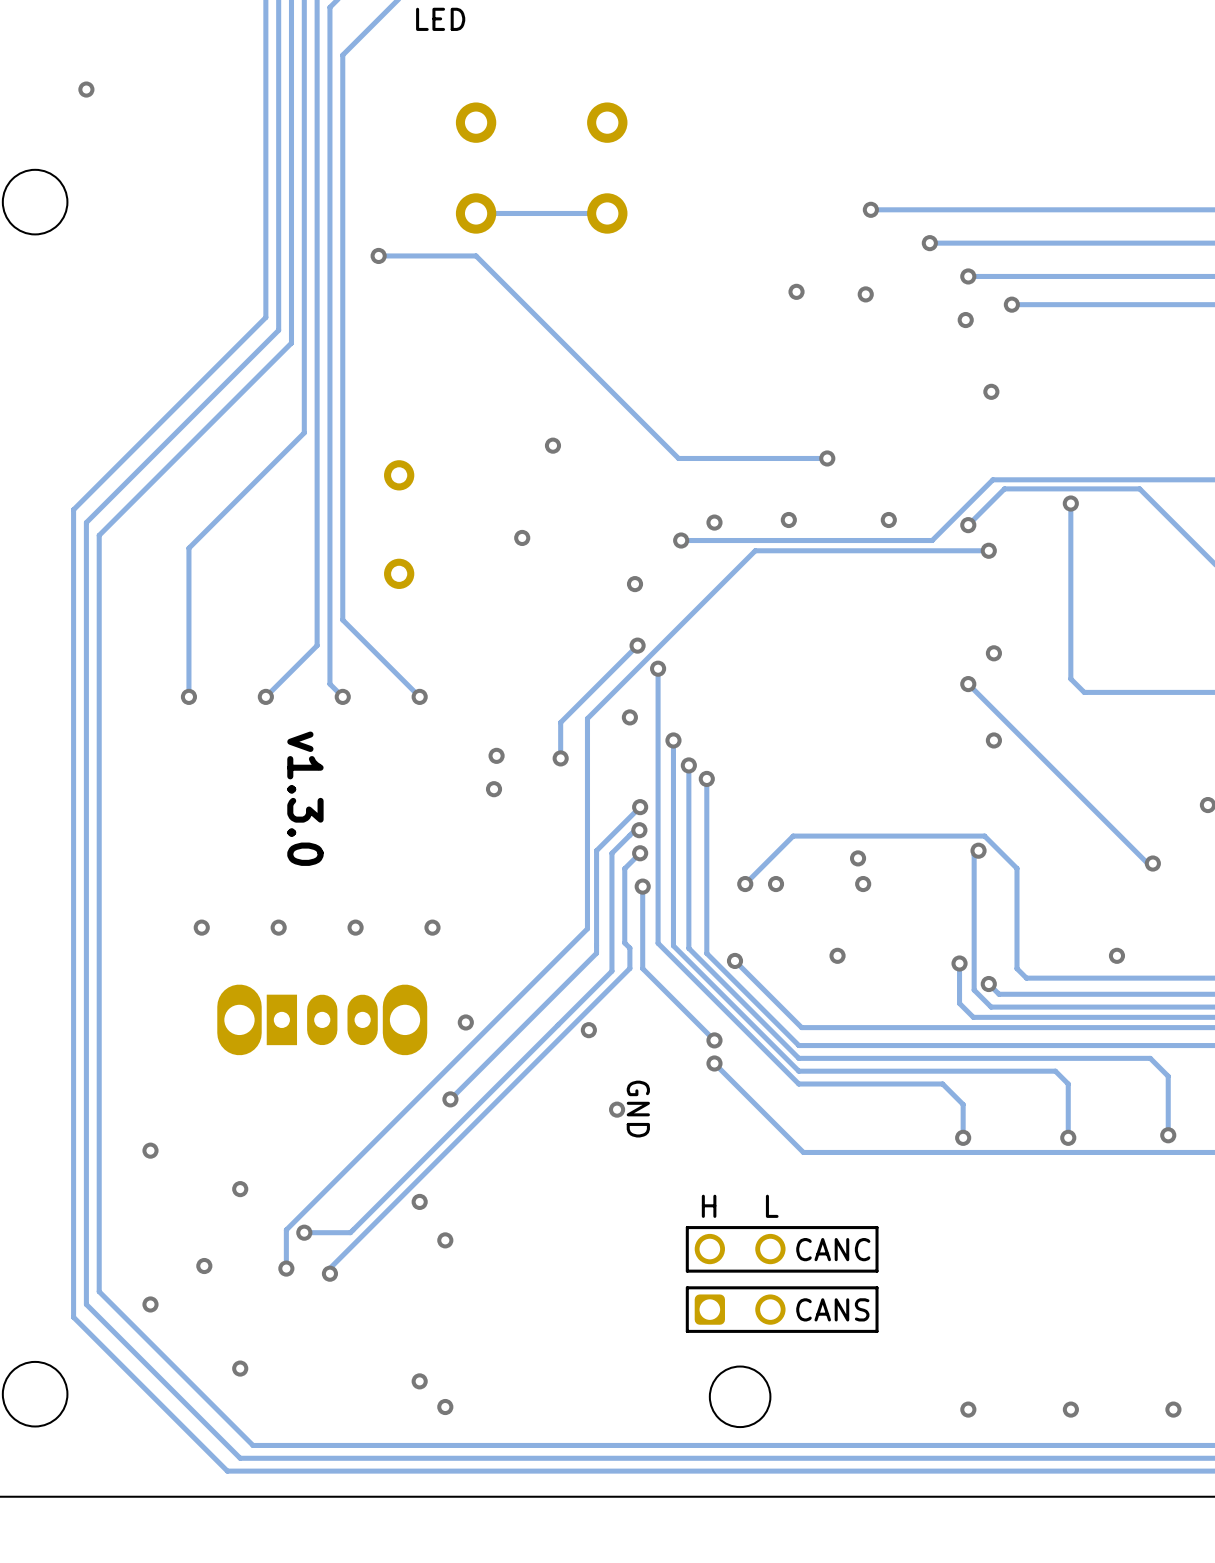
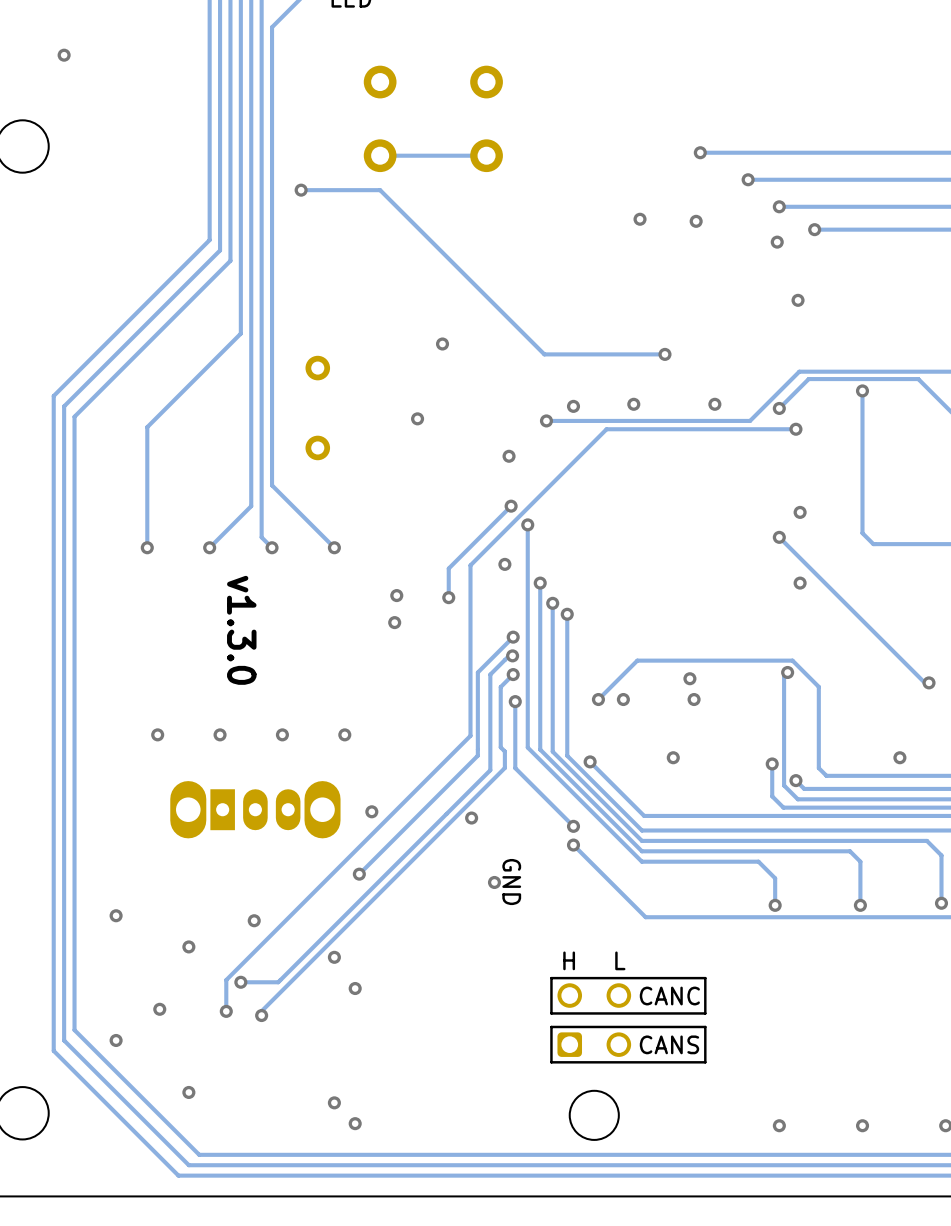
via: none -> (254, 920)

